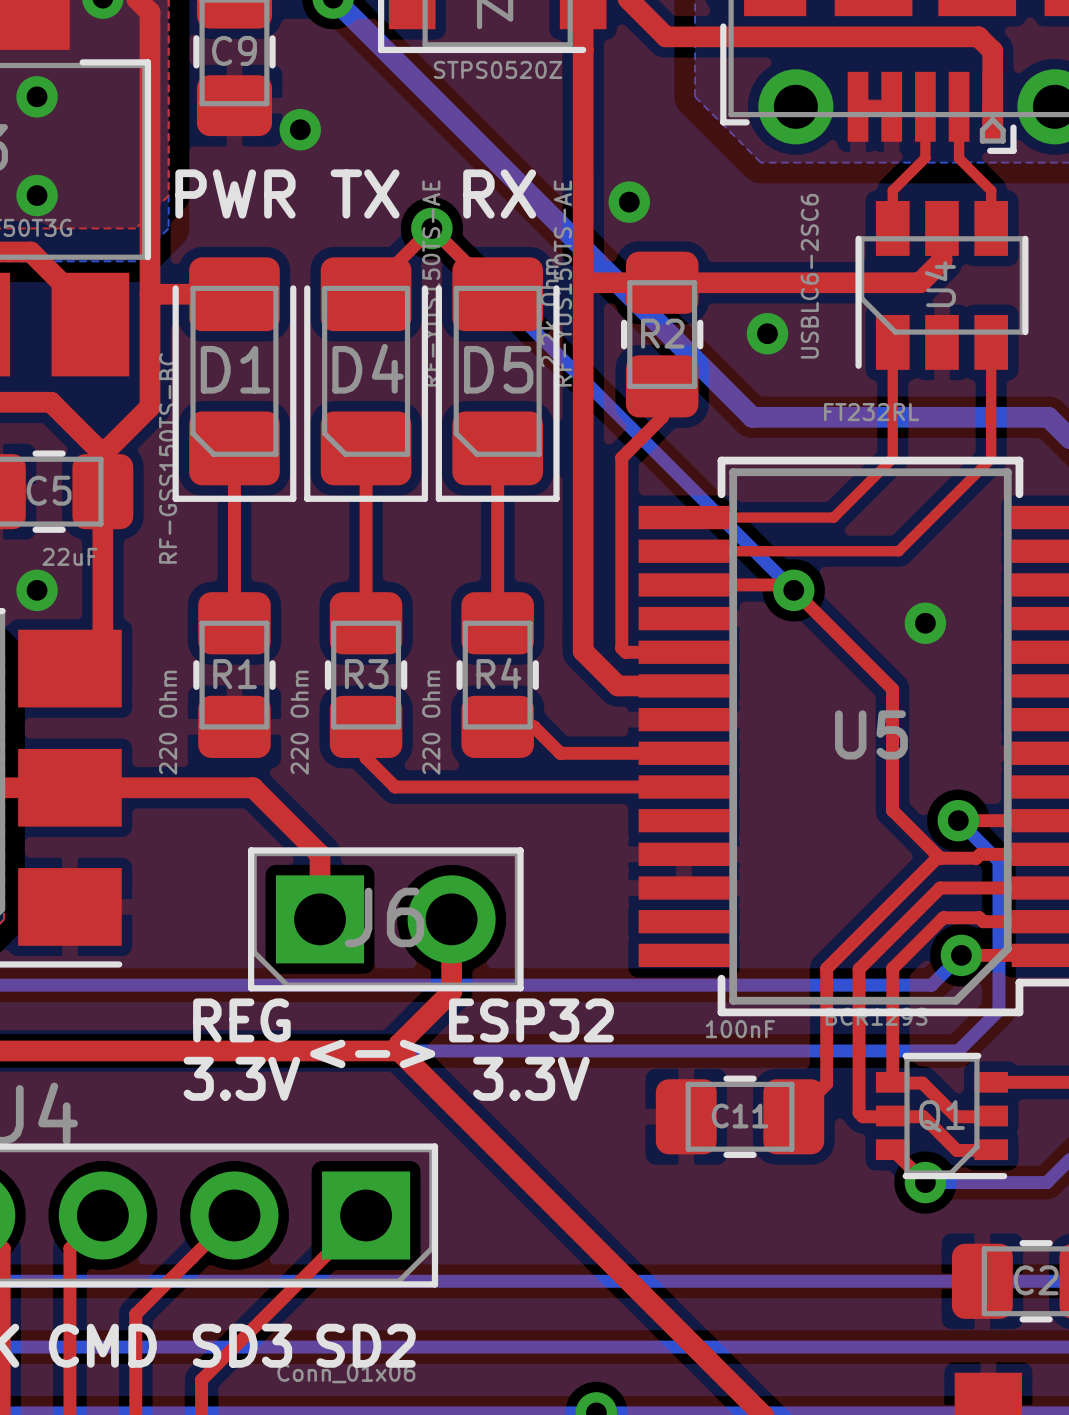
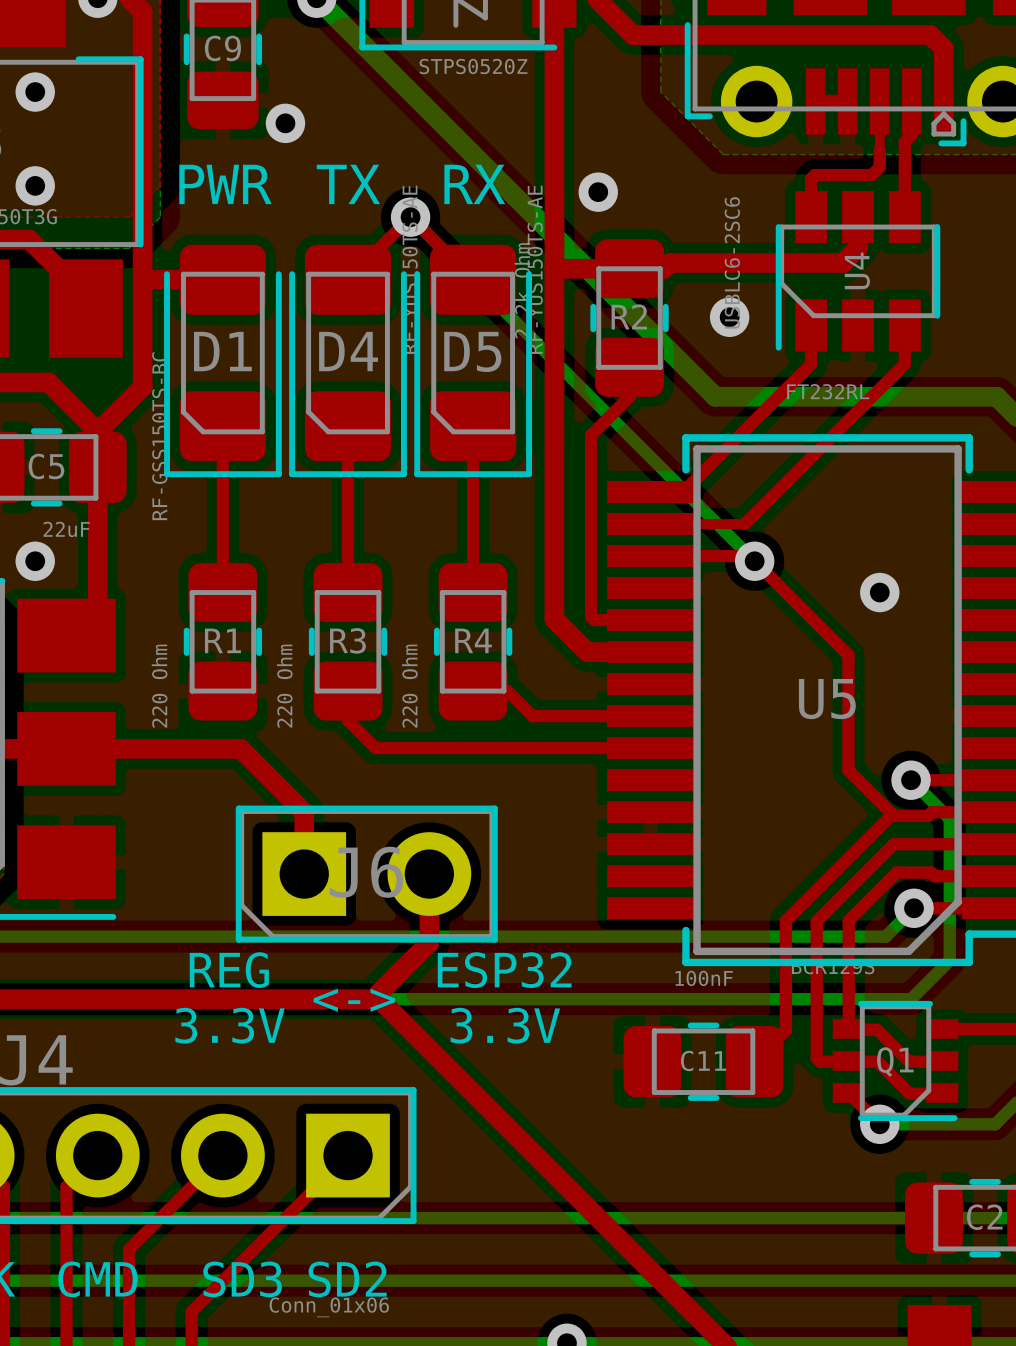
top track: (959, 142) (959, 158) (991, 190) (991, 228) -> (911, 135) (904, 142) (904, 217)
top track: (925, 157) (892, 190) (892, 228) -> (879, 150) (879, 167) (871, 175) (814, 175) (811, 178) (811, 217)
top track: (941, 228) (941, 260) (920, 282) (698, 282) -> (858, 217) (858, 247) (842, 262) (669, 262) (664, 268)
U4 position: (941, 285) -> (858, 271)
top track: (892, 342) (892, 458) (833, 517) (718, 517) -> (811, 325) (811, 363) (683, 492)
top track: (991, 342) (991, 458) (898, 551) (783, 551) -> (904, 325) (904, 363) (744, 524)

